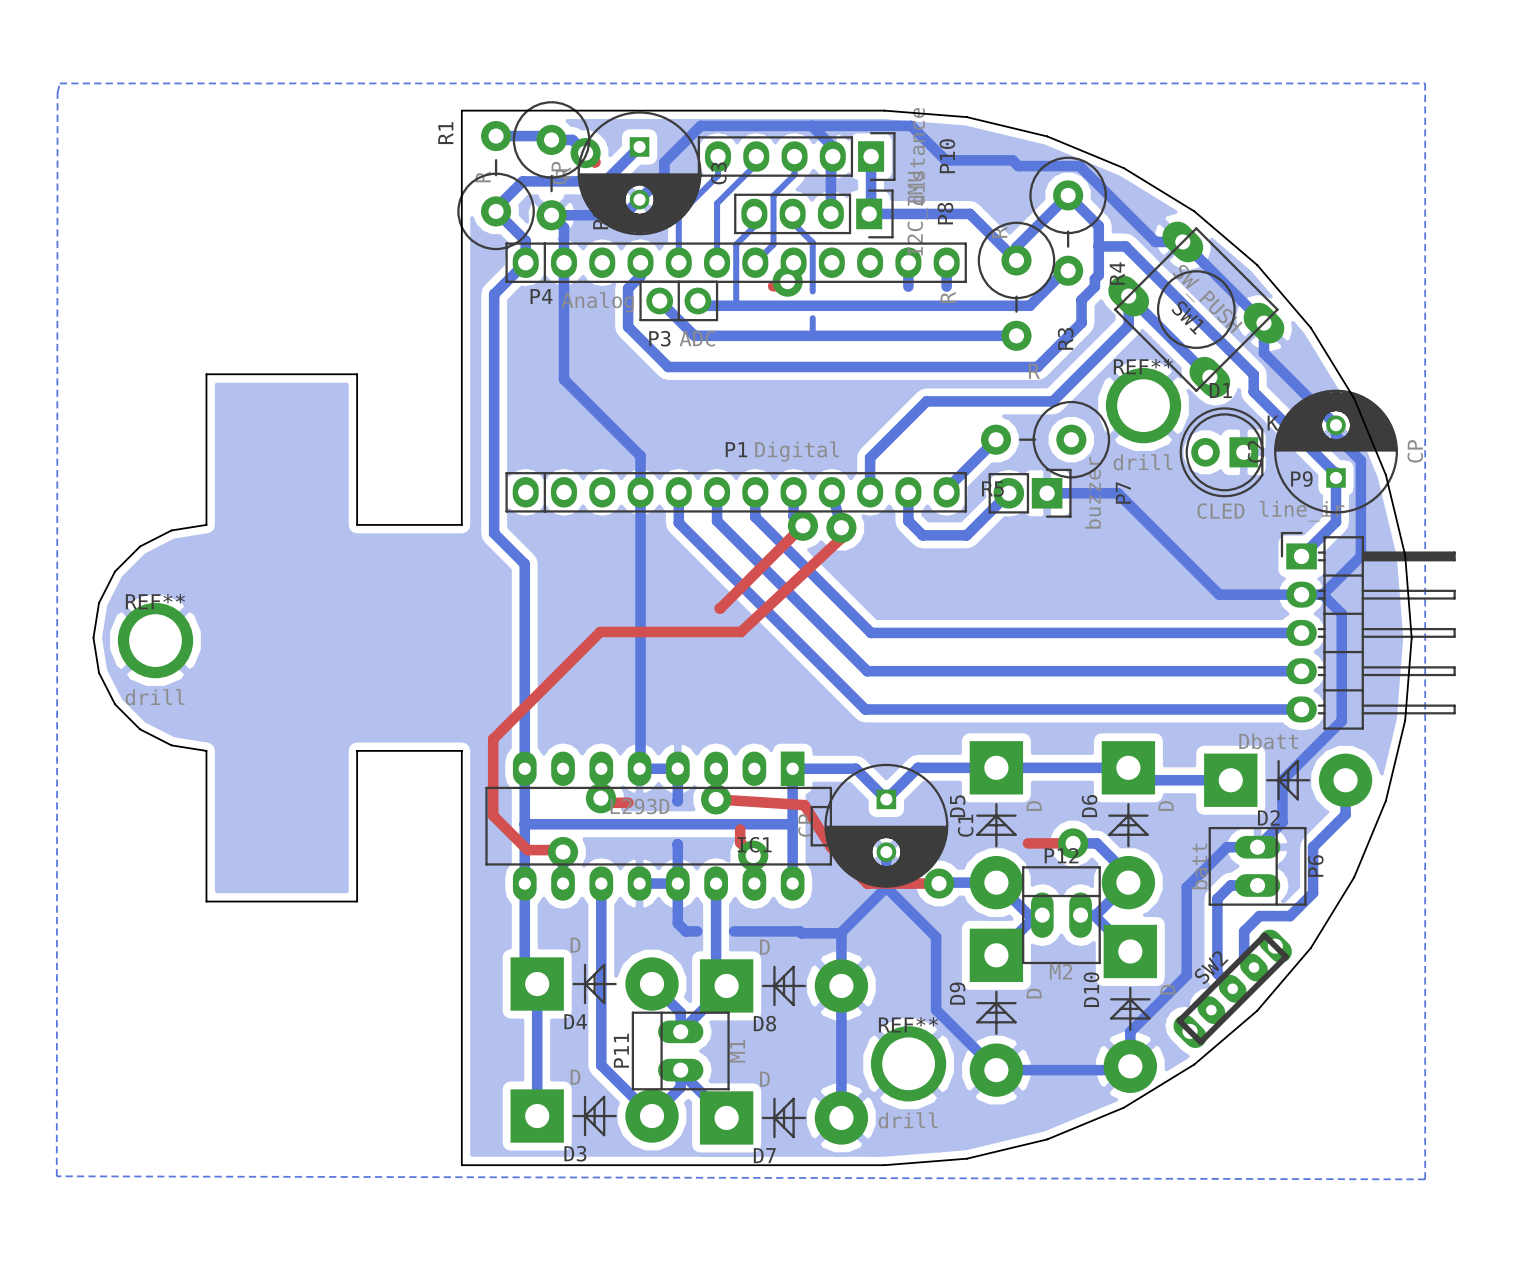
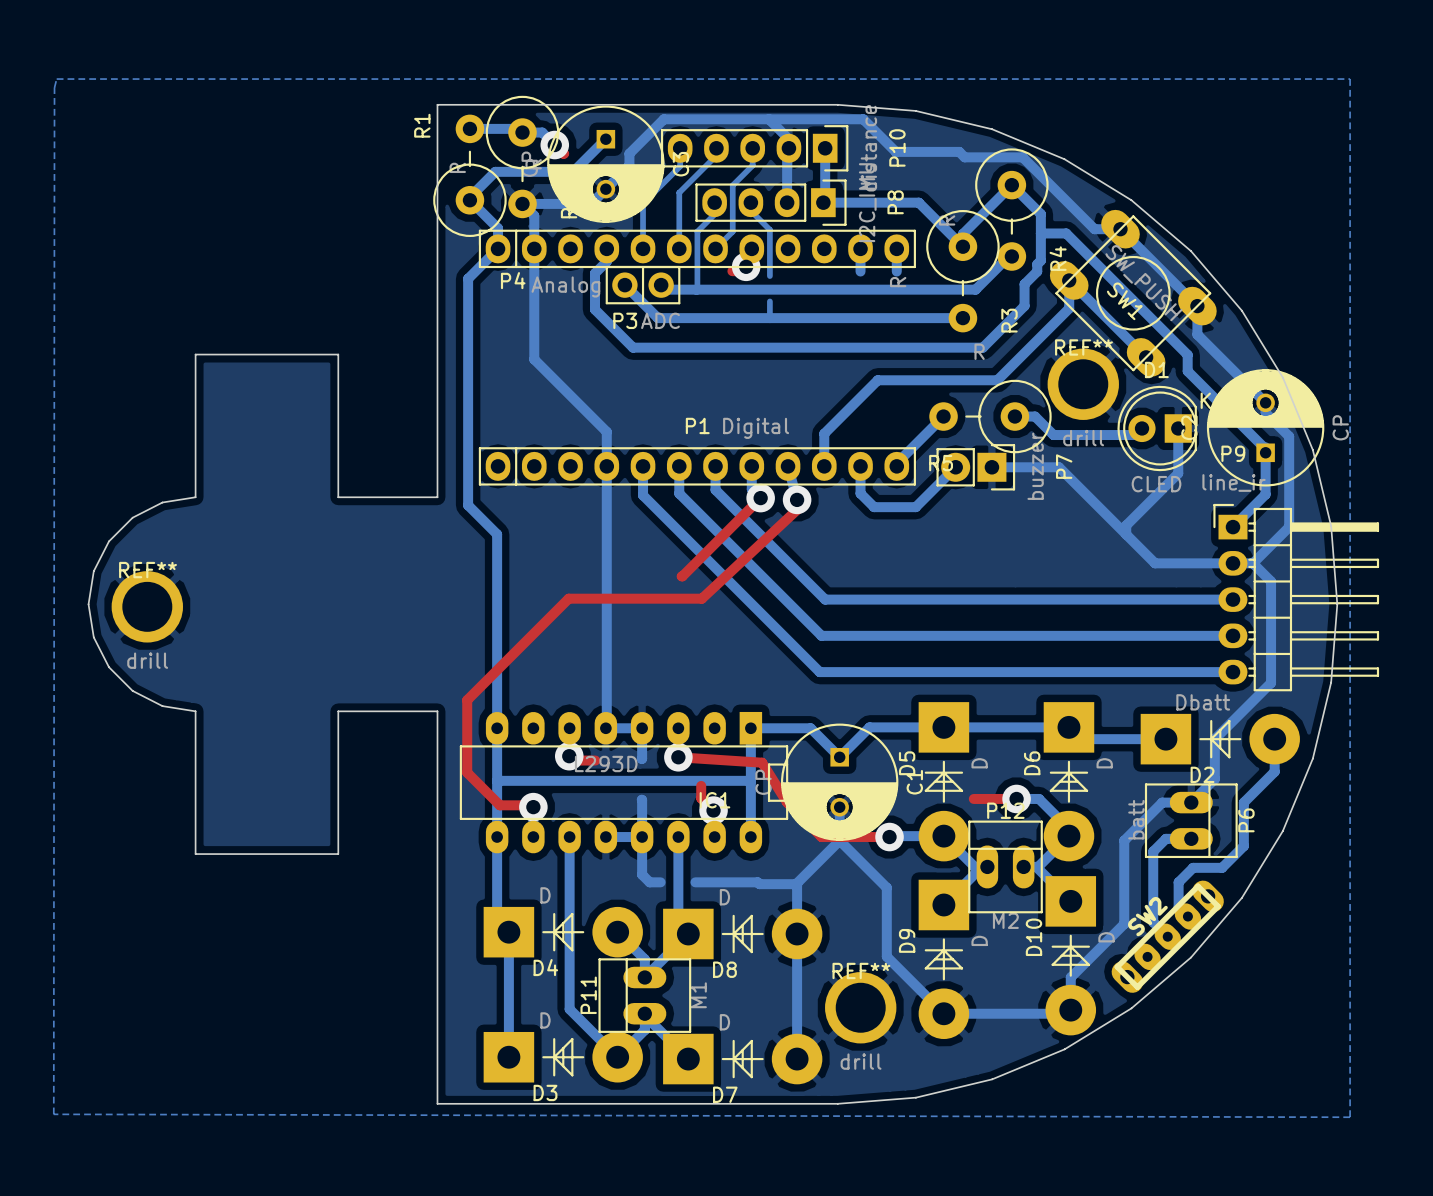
bottom track: none -> (1014, 416) (1035, 416) (1053, 435) (1135, 435) (1142, 428)
bottom track: none -> (1178, 428) (1178, 473) (1126, 525) (1126, 534)

